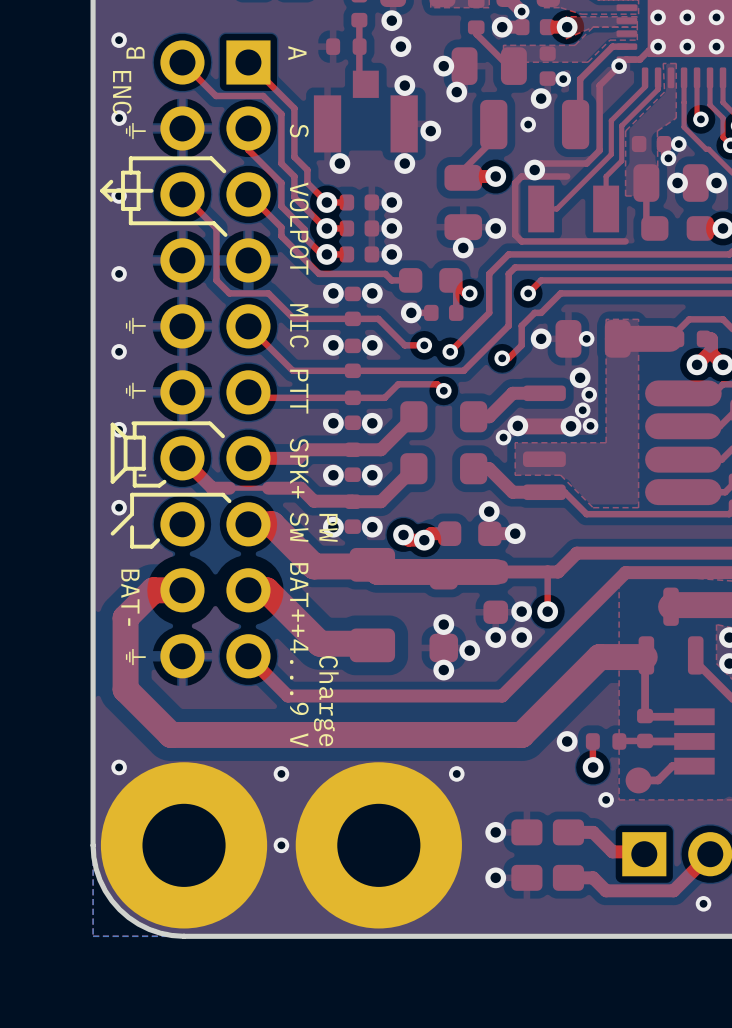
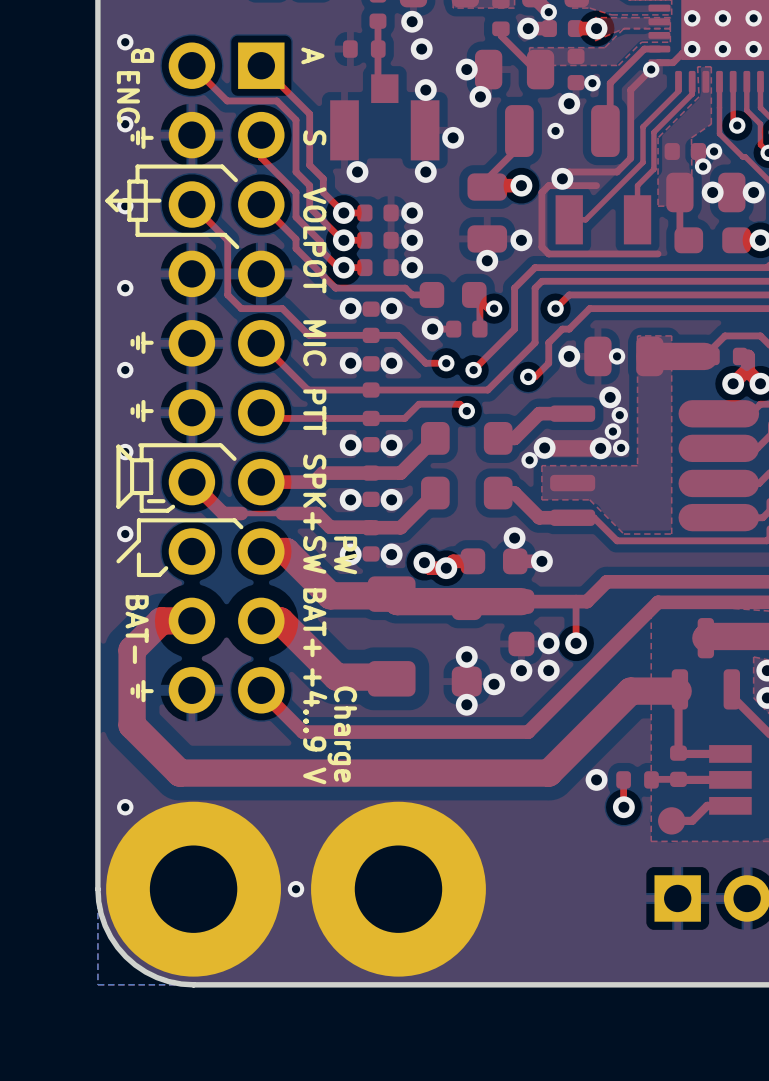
via: (281, 773) -> none
via: (456, 773) -> none
via: (606, 799) -> none
via: (495, 832) -> none
part: (547, 832) -> none
top track: (568, 832) (593, 832) (612, 851) (641, 851) (644, 854) -> none
top track: (710, 854) (673, 890) (606, 890) (593, 877) (568, 877) -> none
via: (495, 877) -> none
part: (547, 877) -> none
via: (703, 903) -> none

